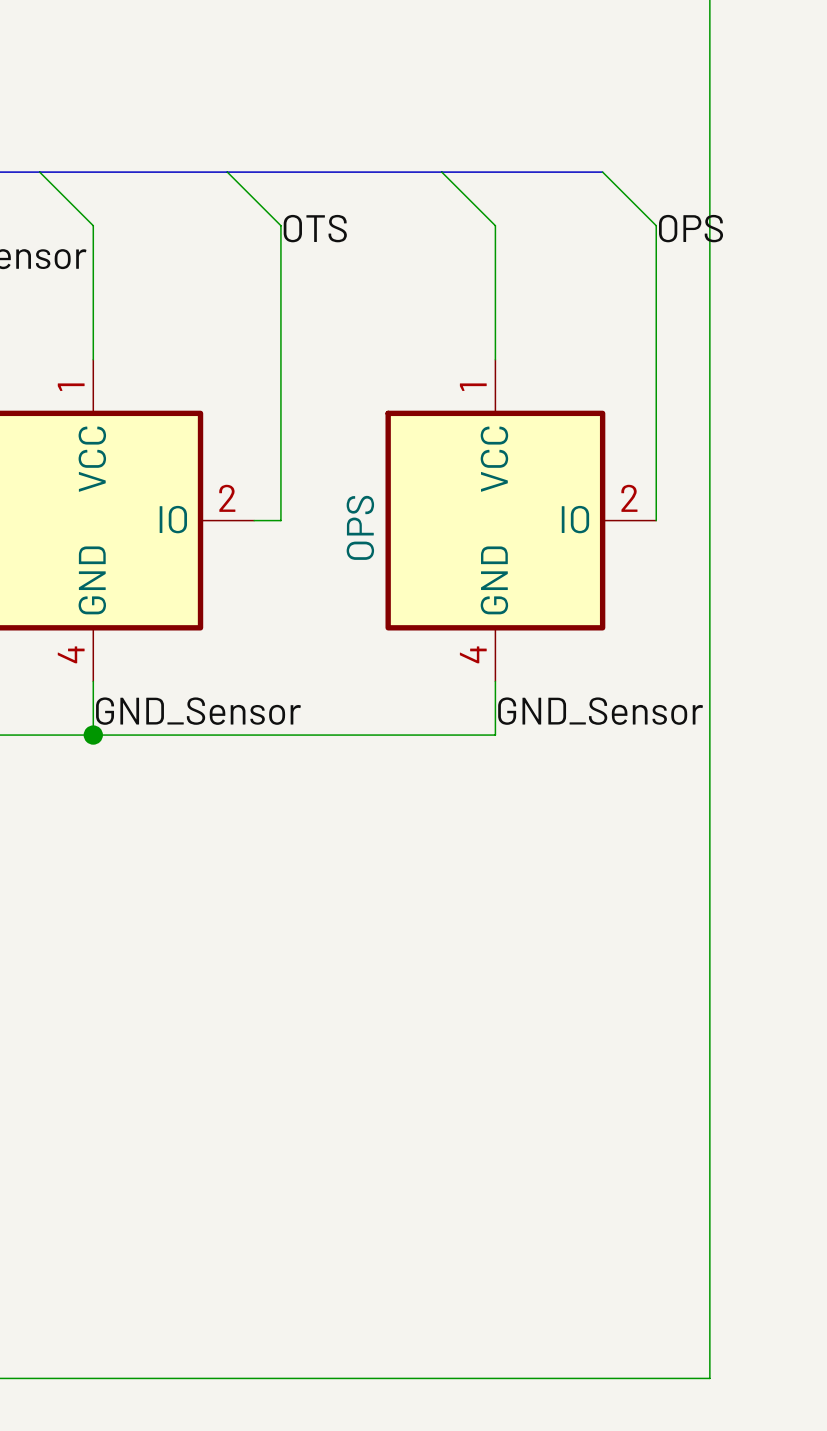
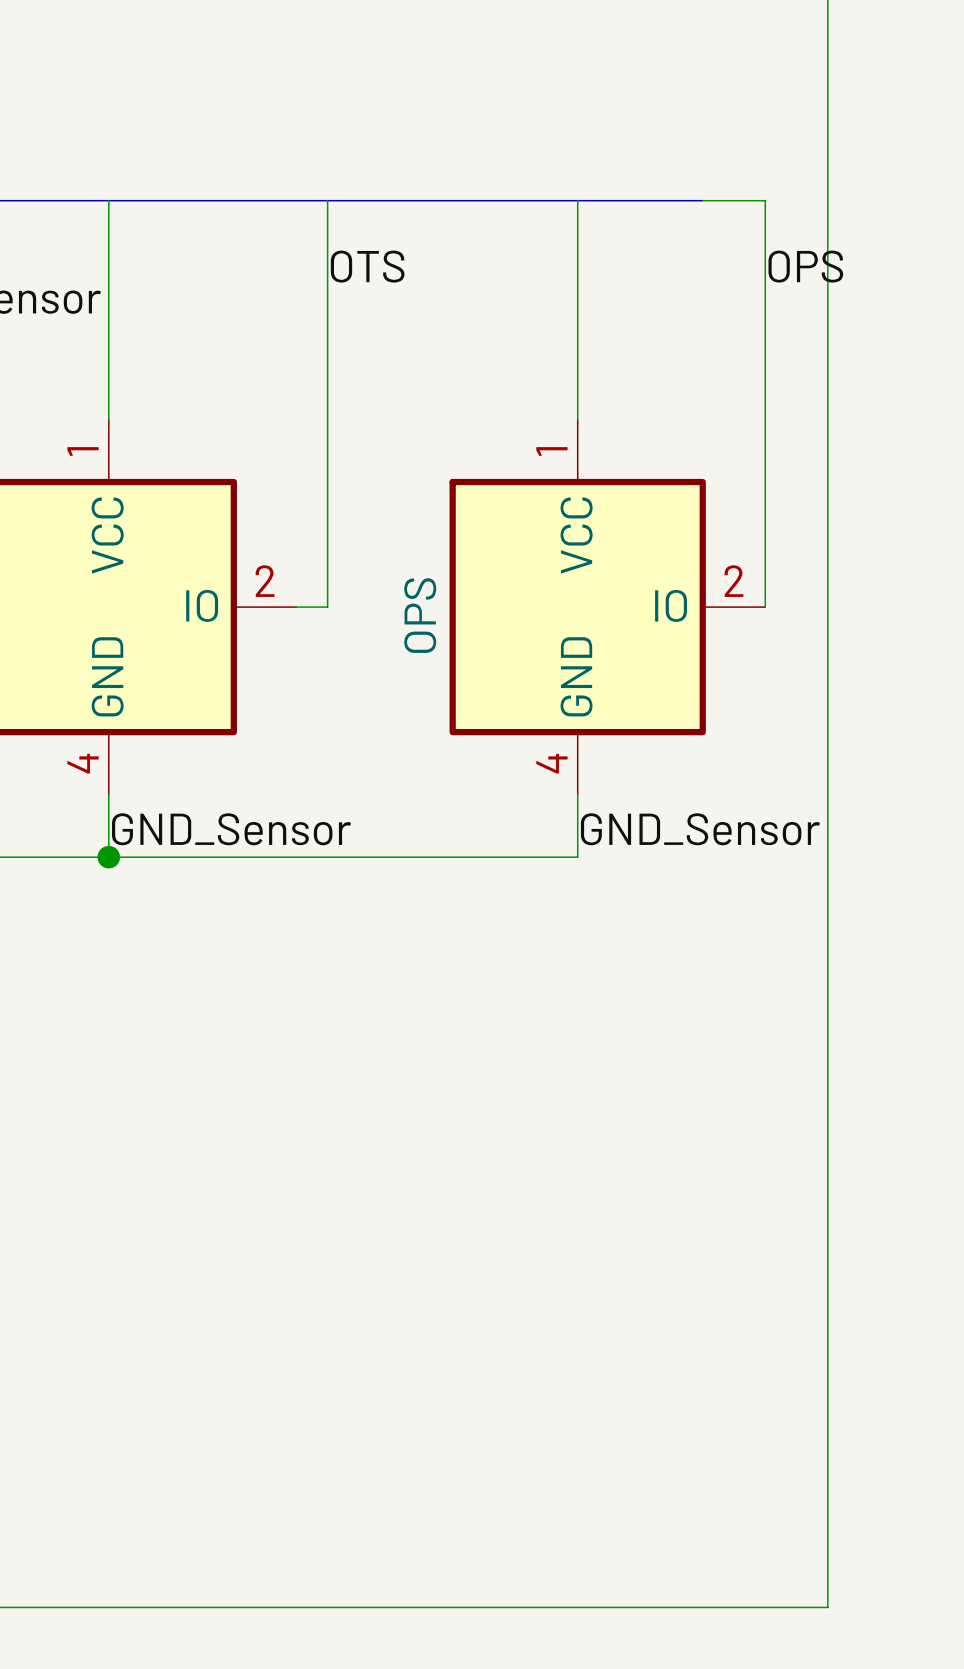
wire: (39, 172) (93, 225) -> (108, 200) (108, 263)
wire: (227, 172) (280, 225) -> (327, 200) (327, 263)
wire: (441, 172) (495, 225) -> (577, 200) (577, 263)
wire: (602, 172) (656, 225) -> (702, 200) (765, 200) (765, 263)

